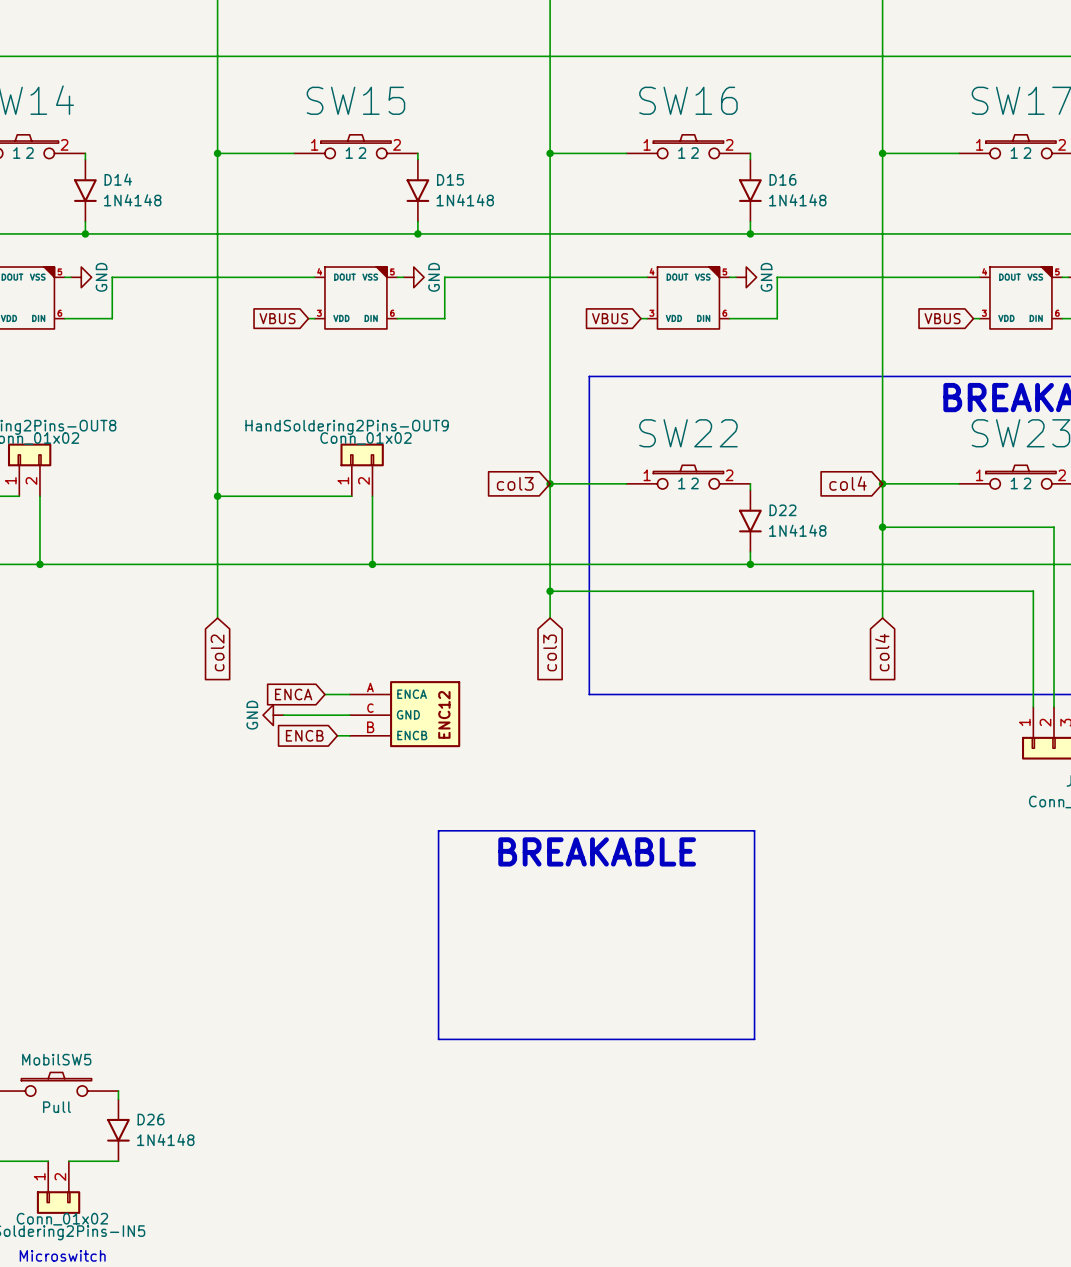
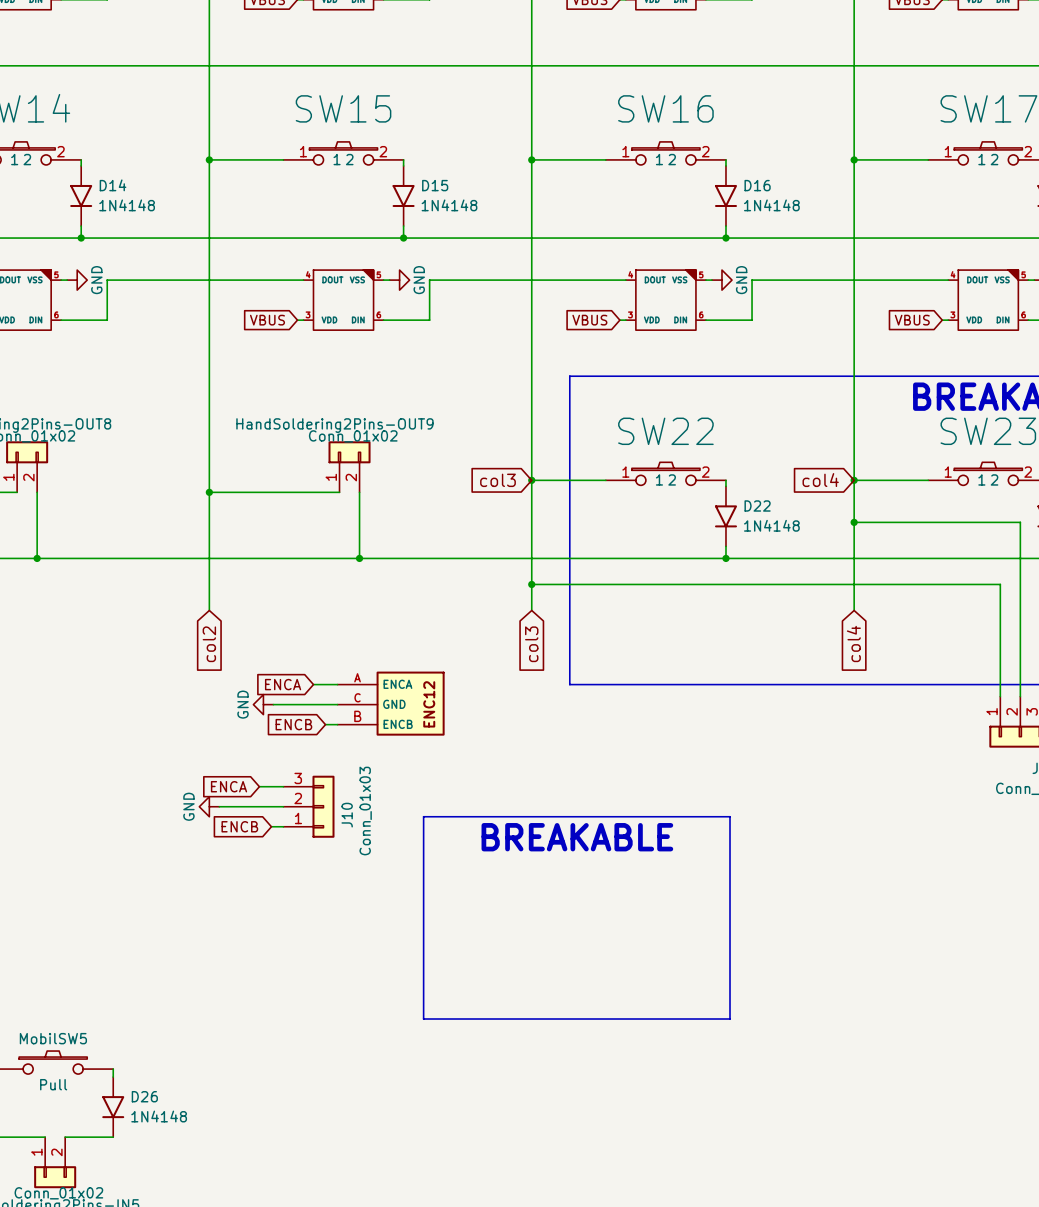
global label: none -> ENCA (229, 786)
wire: none -> (259, 786) (283, 786)
power symbol: none -> GND (209, 806)
wire: none -> (219, 806) (283, 806)
J10: none -> Conn_01x03 (308, 806)
global label: none -> ENCB (239, 826)
wire: none -> (271, 826) (283, 826)

